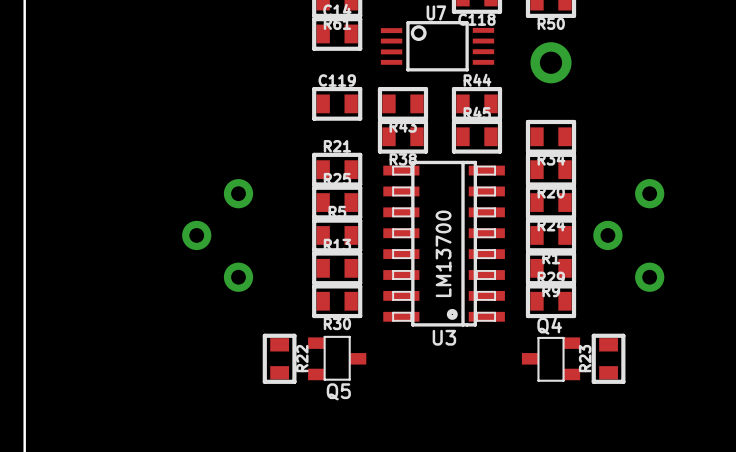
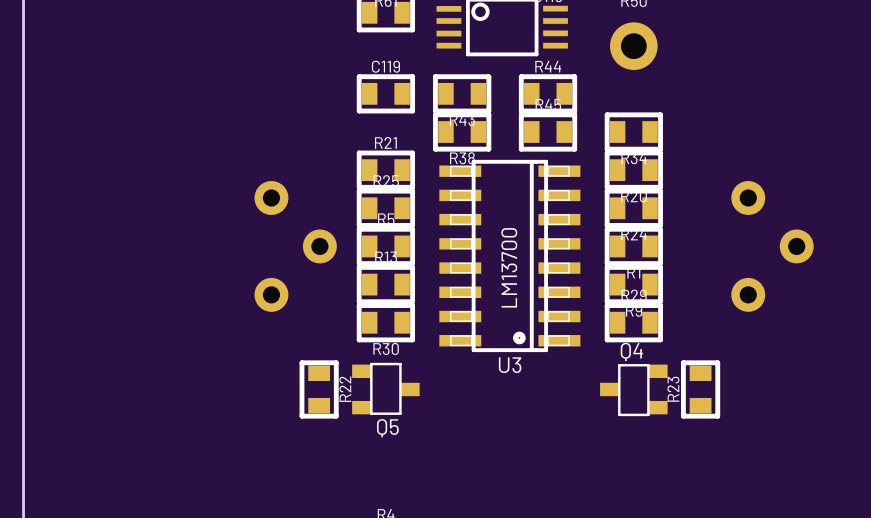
part rotation: 0° (217, 235) -> 180° (295, 246)
part rotation: 0° (628, 235) -> 180° (772, 246)

